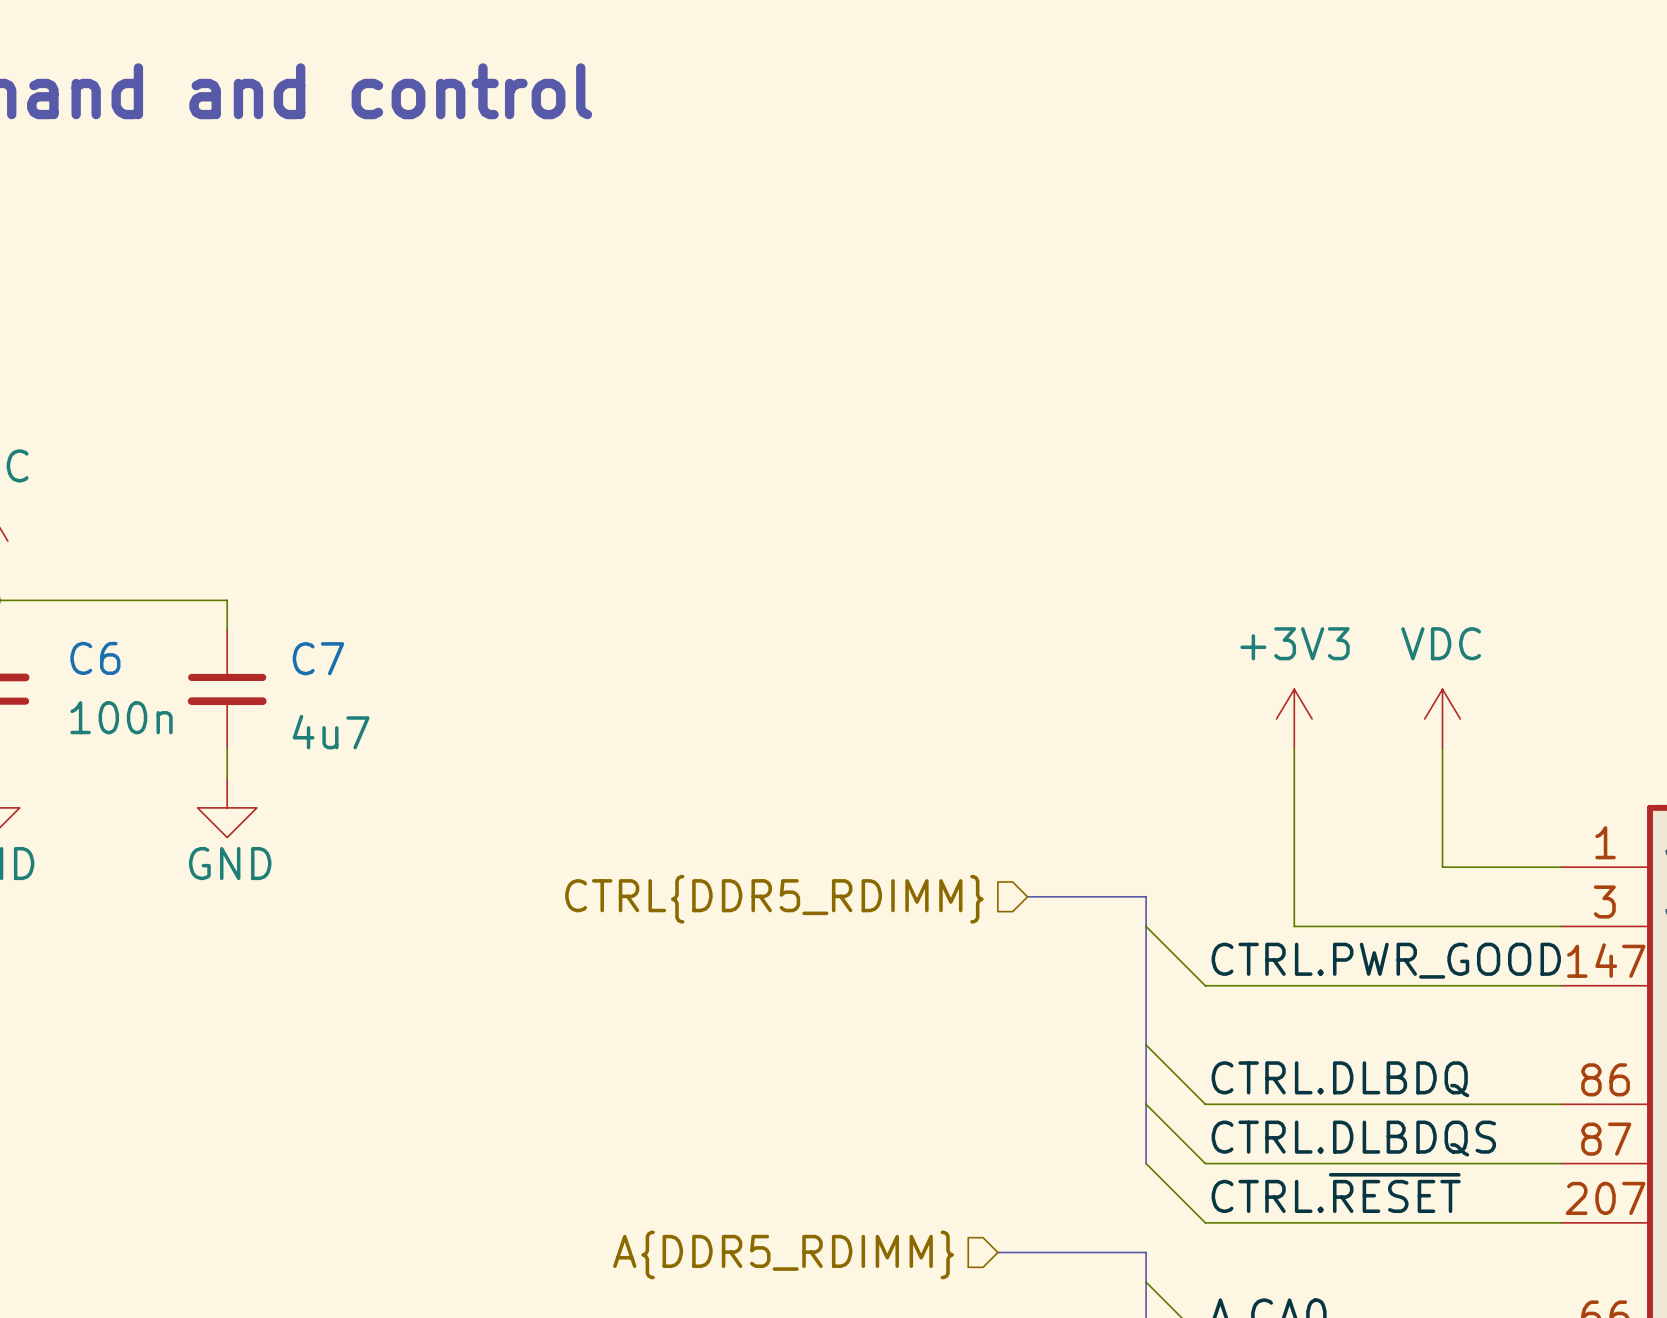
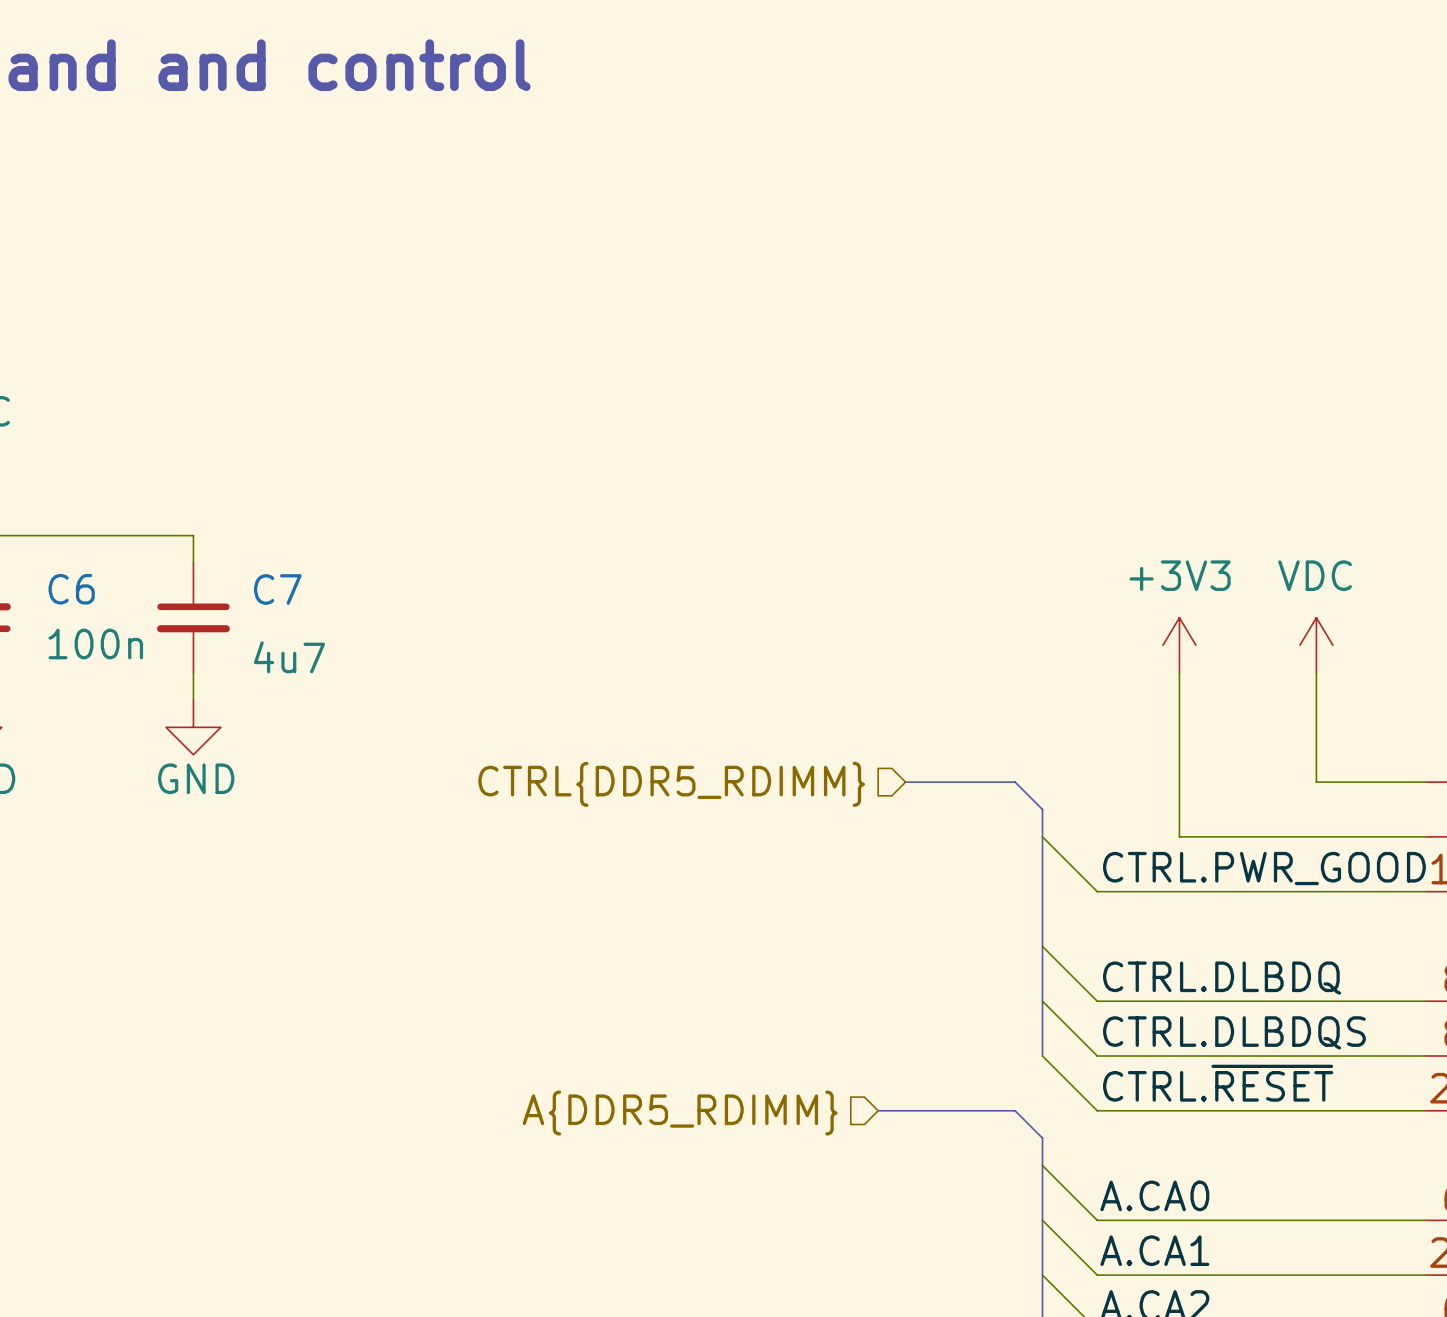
bus: (1027, 896) (1146, 896) -> (905, 782) (1015, 782) (1042, 809)
hierarchical label position: CTRL{DDR5_RDIMM} (774, 899) -> CTRL{DDR5_RDIMM} (671, 784)
bus: (997, 1252) (1146, 1252) -> (878, 1110) (1015, 1110) (1042, 1138)
hierarchical label position: A{DDR5_RDIMM} (783, 1254) -> A{DDR5_RDIMM} (680, 1113)

